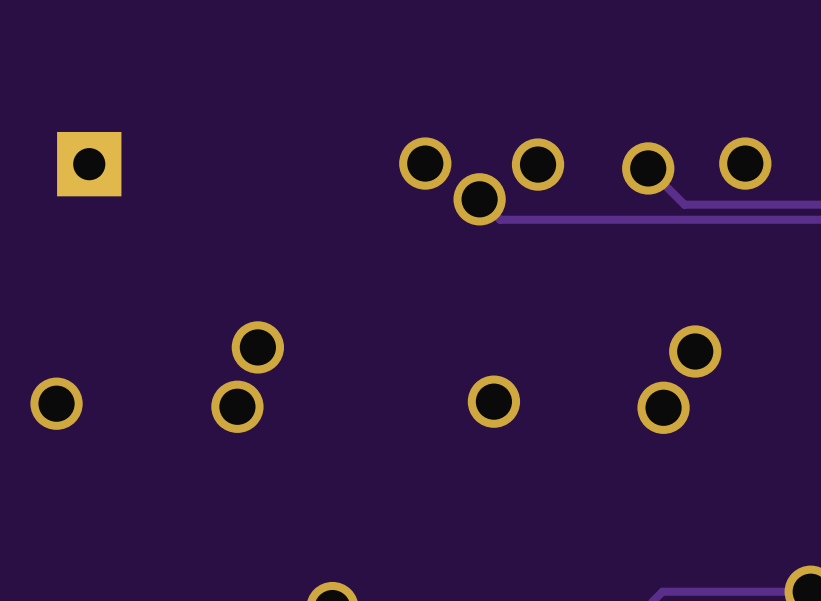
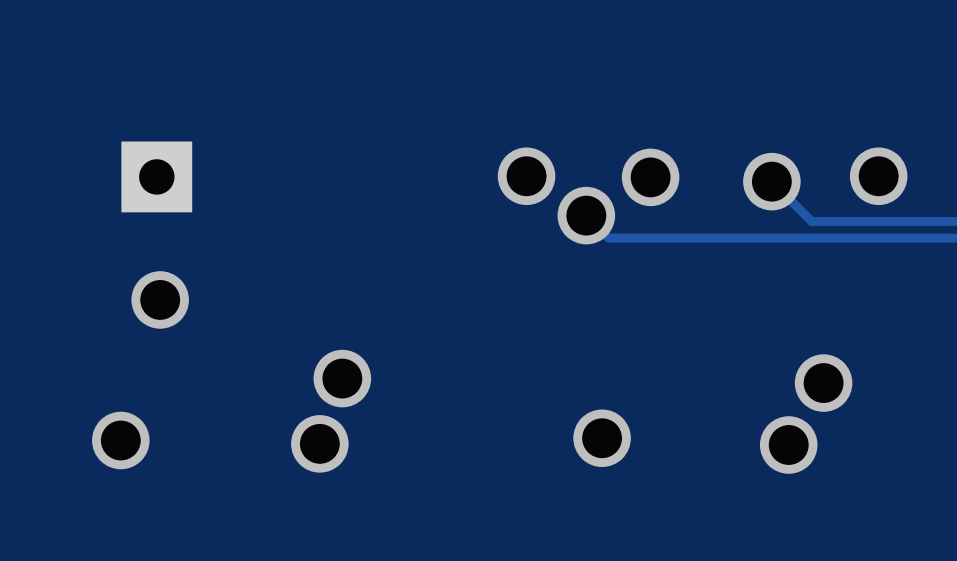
via: none -> (160, 299)

